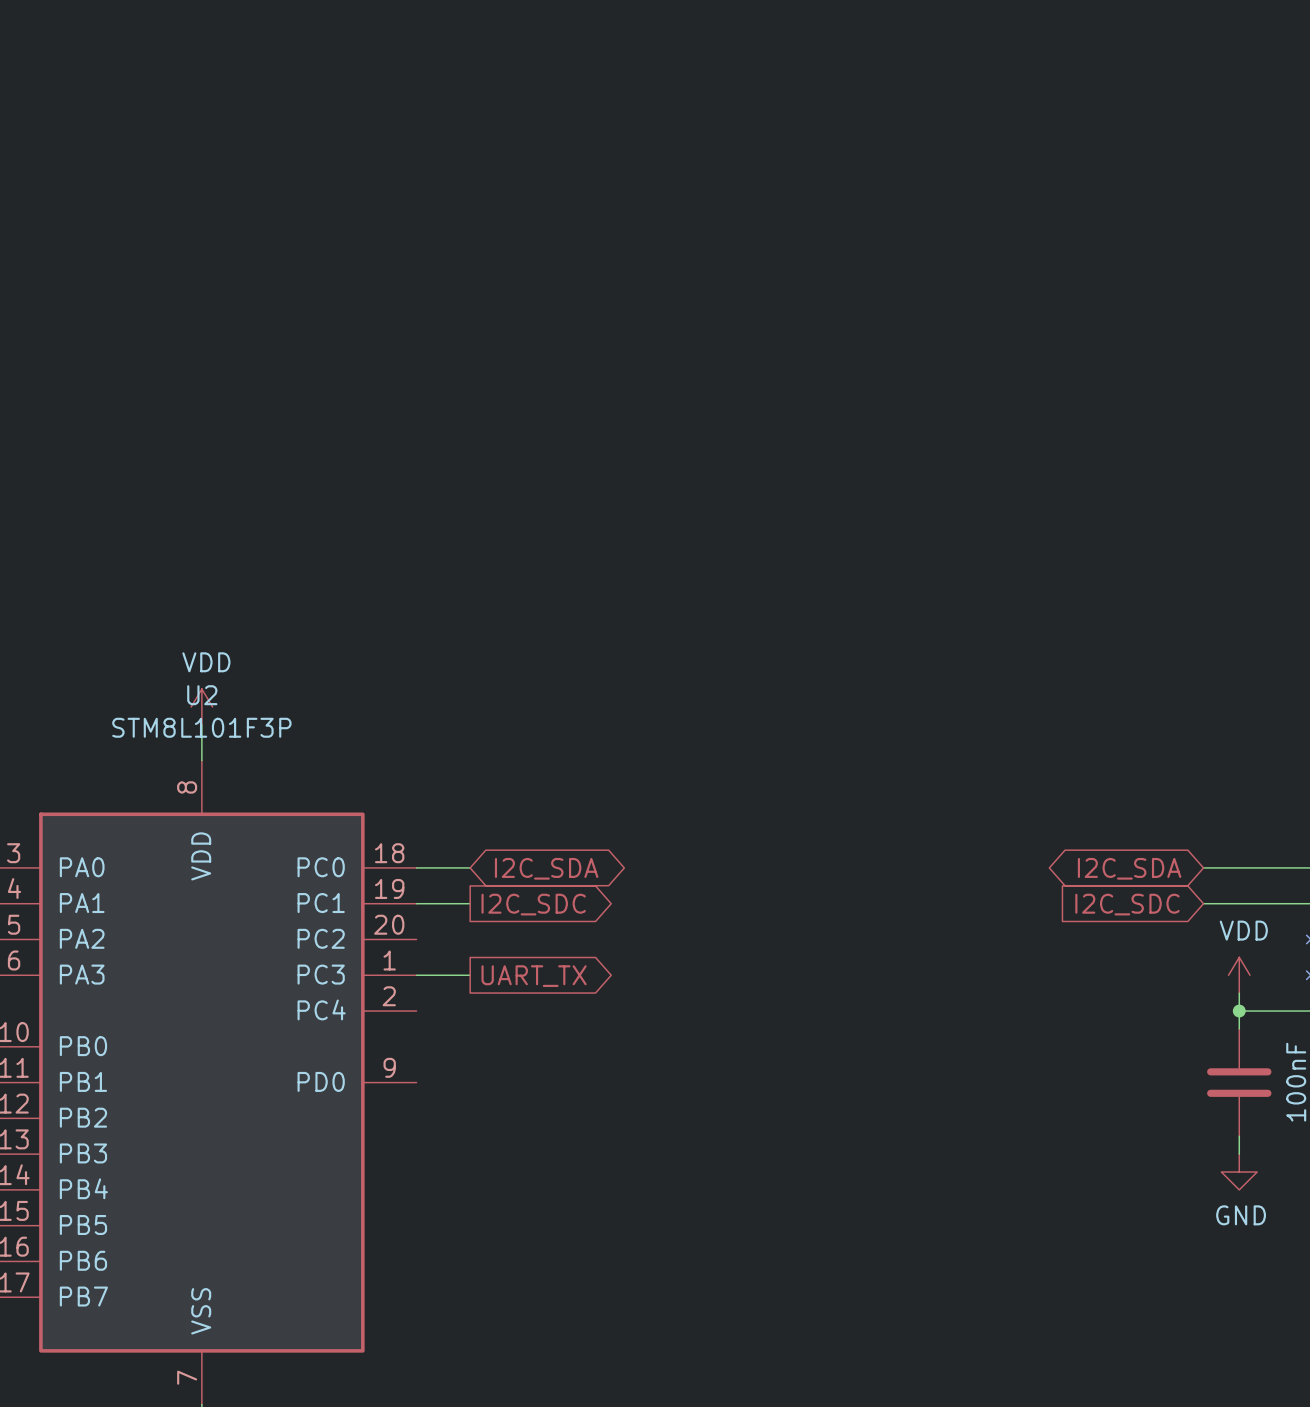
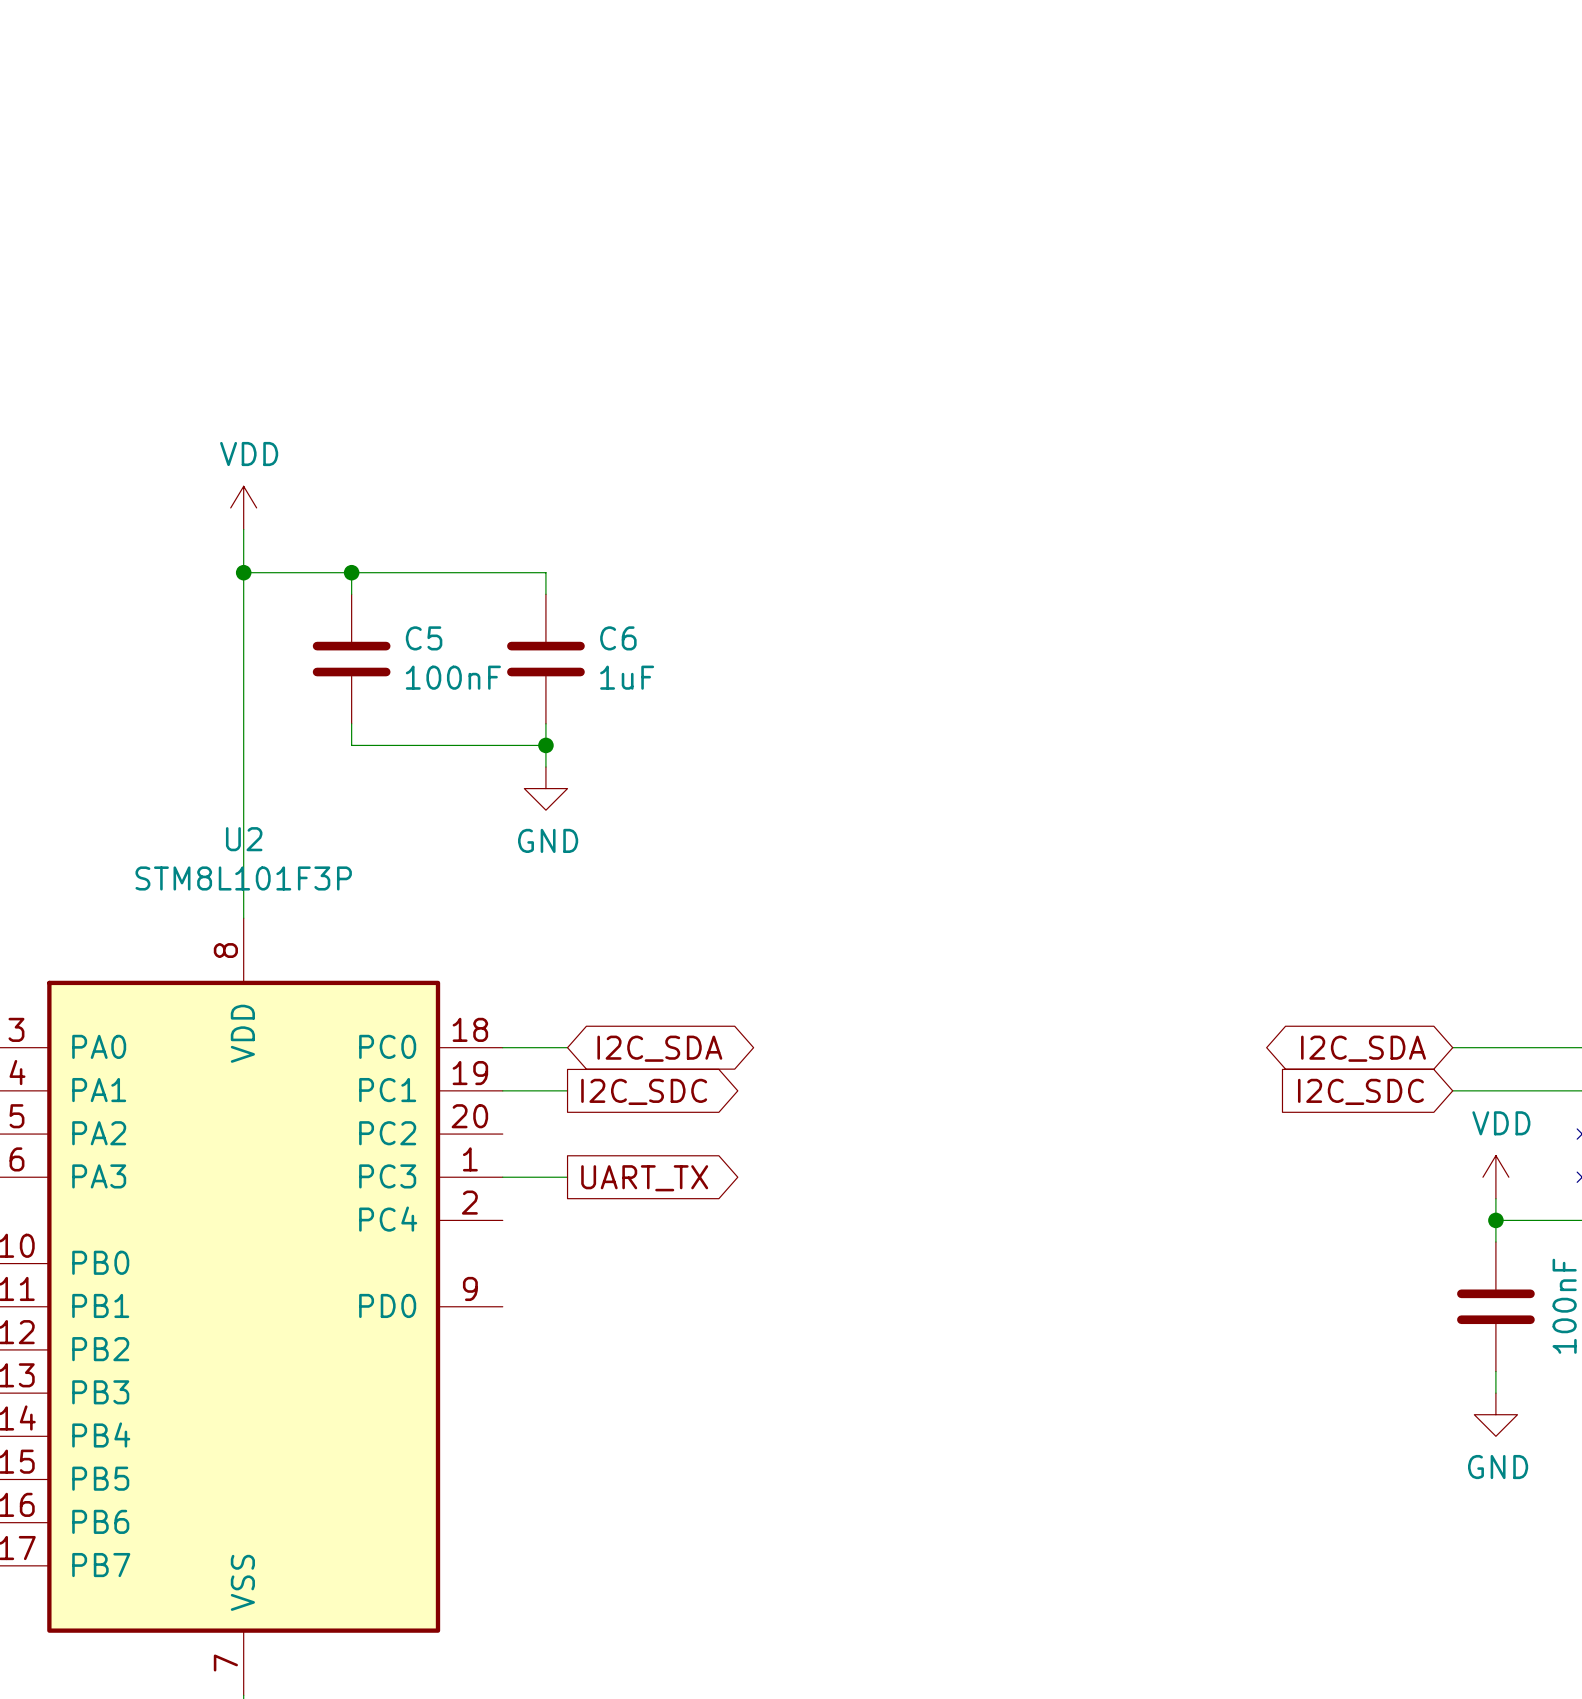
wire: none -> (243, 529) (243, 874)
wire: none -> (243, 572) (545, 572) (545, 594)
junction: none -> (243, 572)
wire: none -> (351, 572) (351, 594)
junction: none -> (351, 572)
C5: none -> 100nF (351, 659)
C6: none -> 1uF (545, 659)
wire: none -> (351, 723) (351, 745) (545, 745)
wire: none -> (545, 723) (545, 767)
junction: none -> (545, 745)
power symbol: none -> GND (545, 788)
power symbol position: VDD (201, 706) -> VDD (243, 507)

